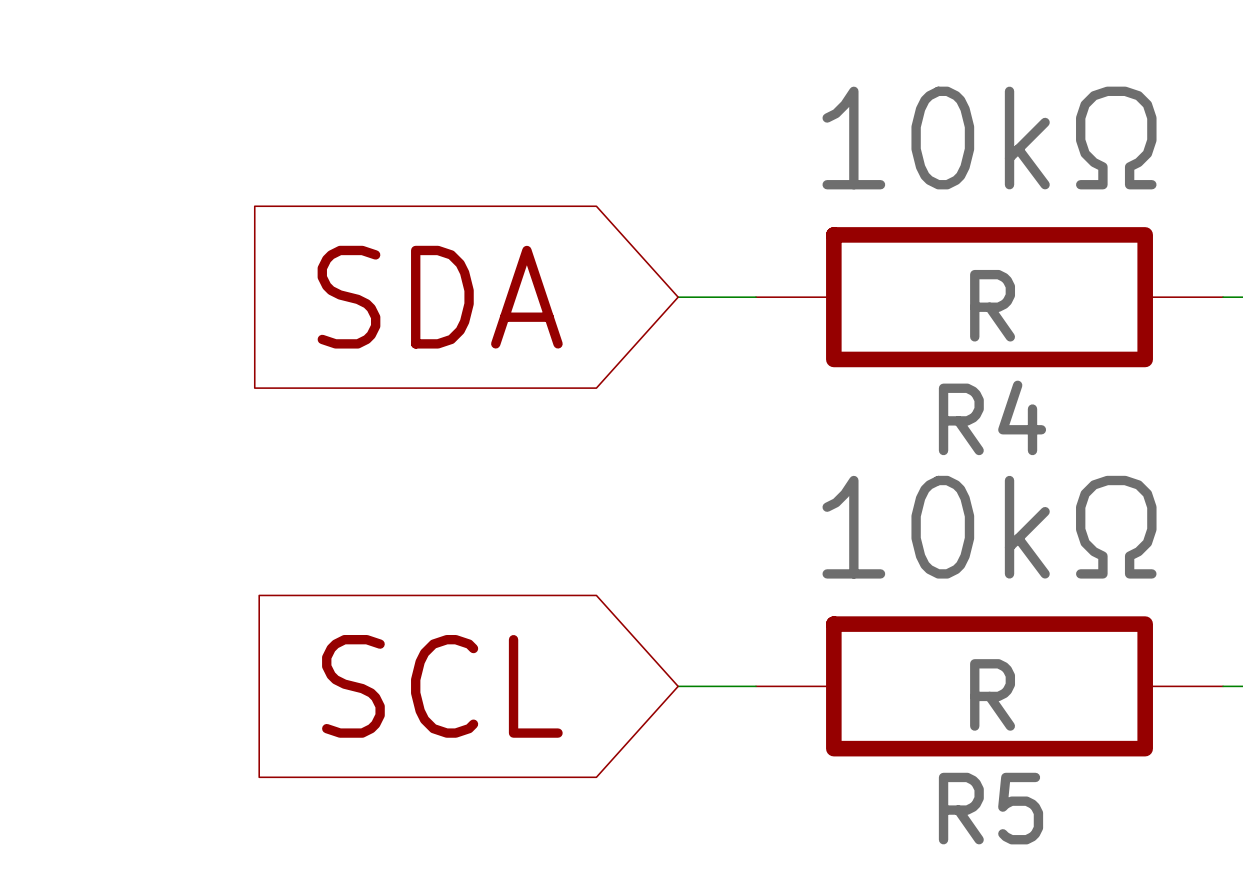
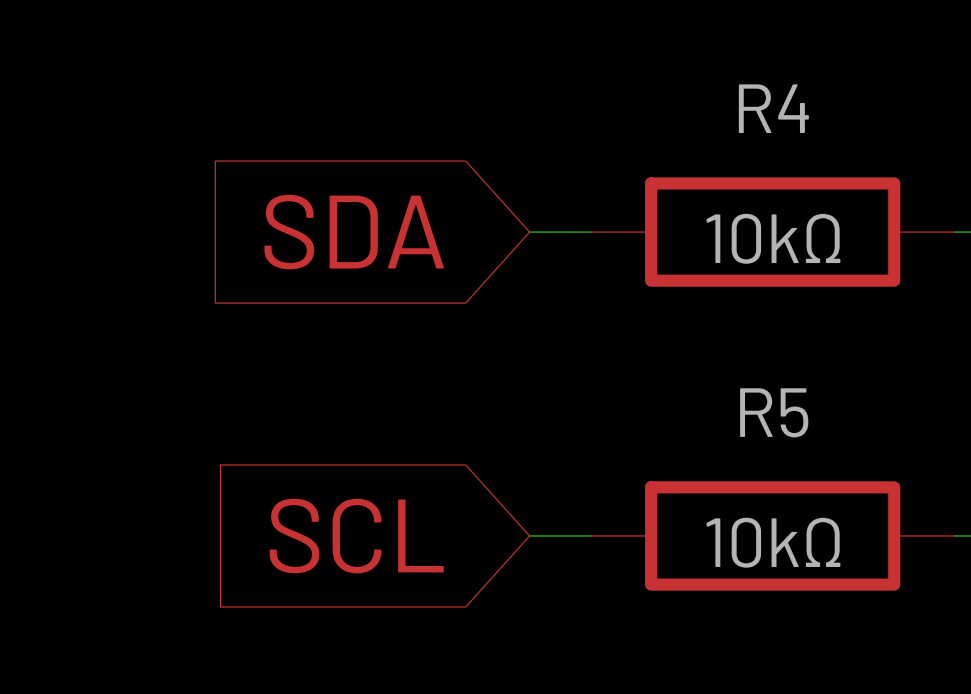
R4 text: 10kΩ (989, 138) -> none
R4 value: R (992, 305) -> 10kΩ (773, 238)
R4 name position: R4 (992, 417) -> R4 (773, 108)
R5 text: 10kΩ (989, 527) -> none
R5 value: R (992, 694) -> 10kΩ (773, 542)
R5 name position: R5 (990, 808) -> R5 (774, 412)

